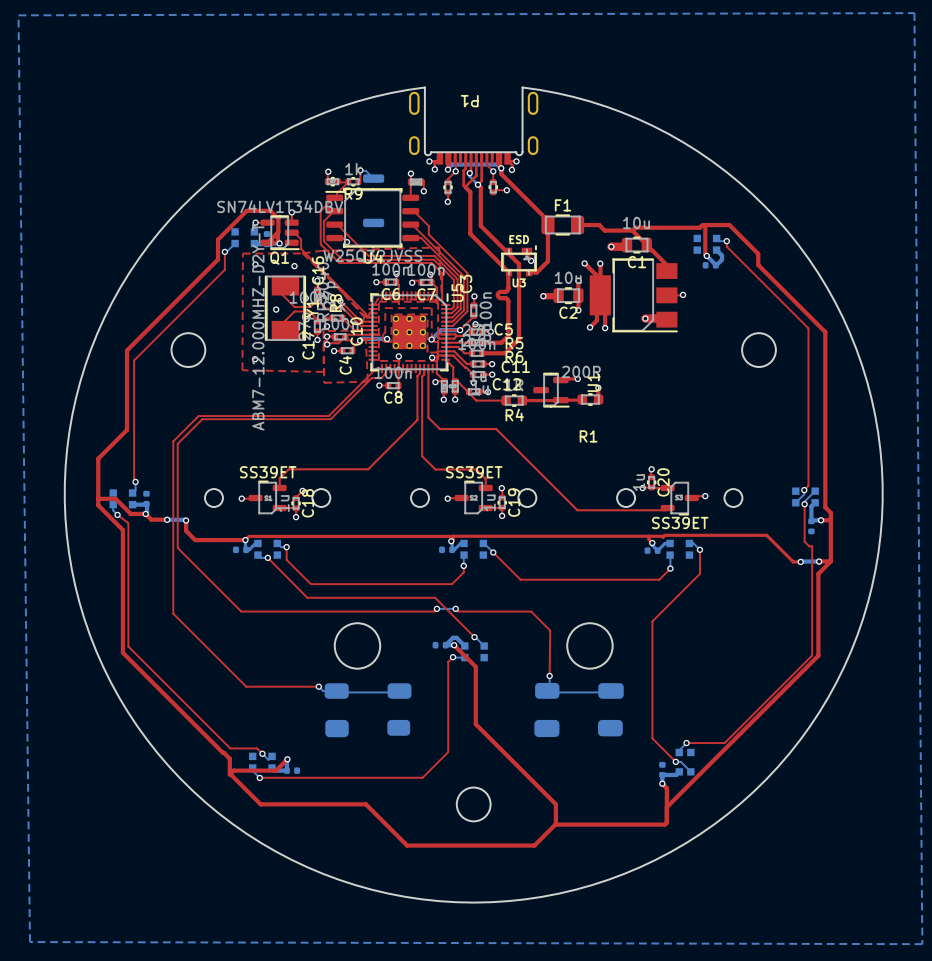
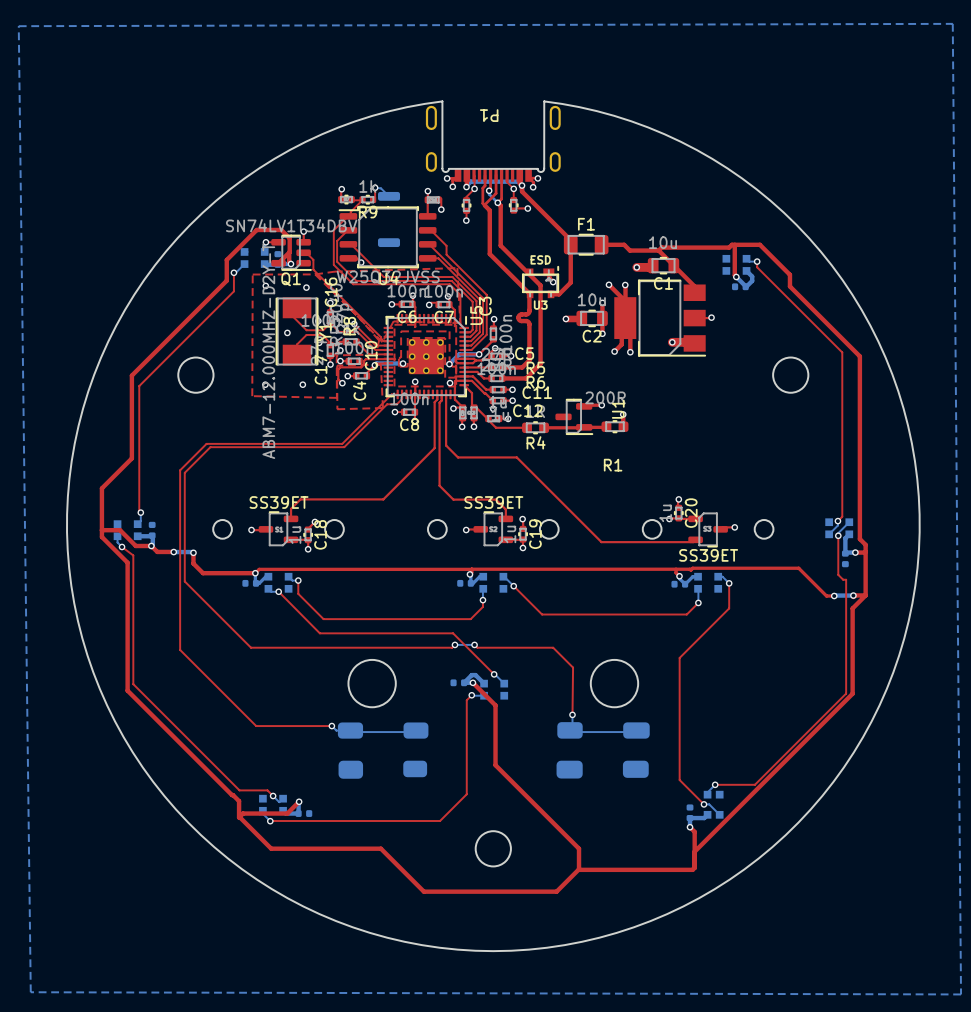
top track: (351, 334) (347, 334) (338, 343) (327, 344) -> (365, 359) (361, 367) (340, 367) (338, 369) (338, 379) (341, 383)
via position: (327, 344) -> (342, 383)

